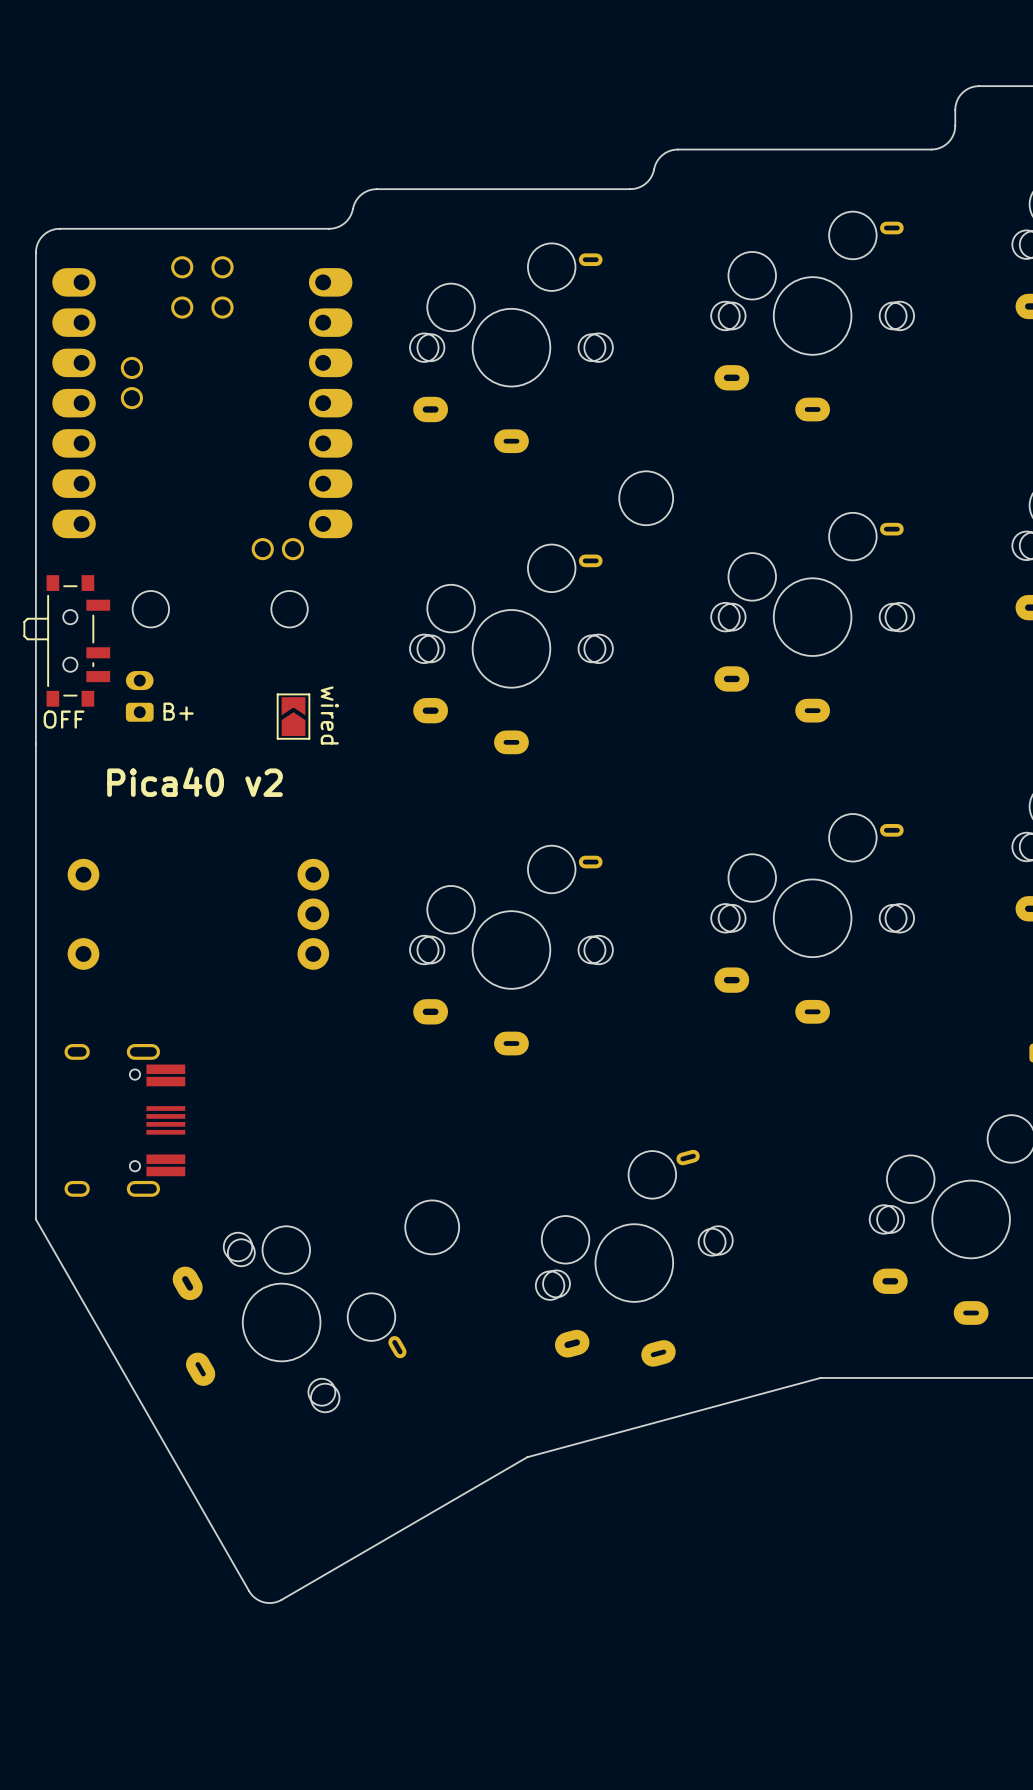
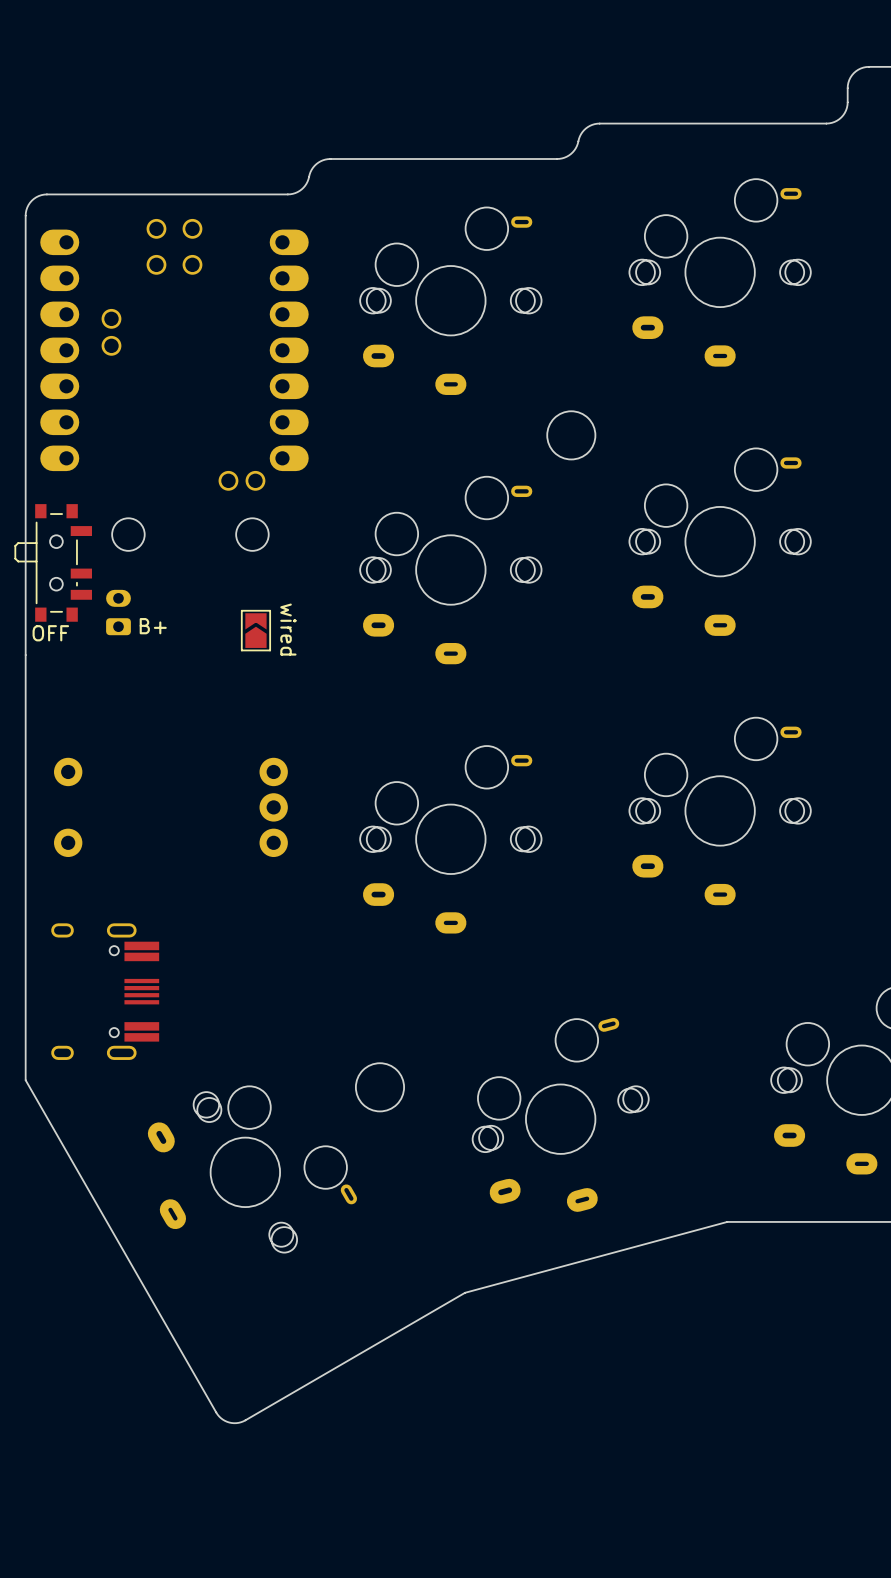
text: Pica40 v2 (195, 782) -> none

